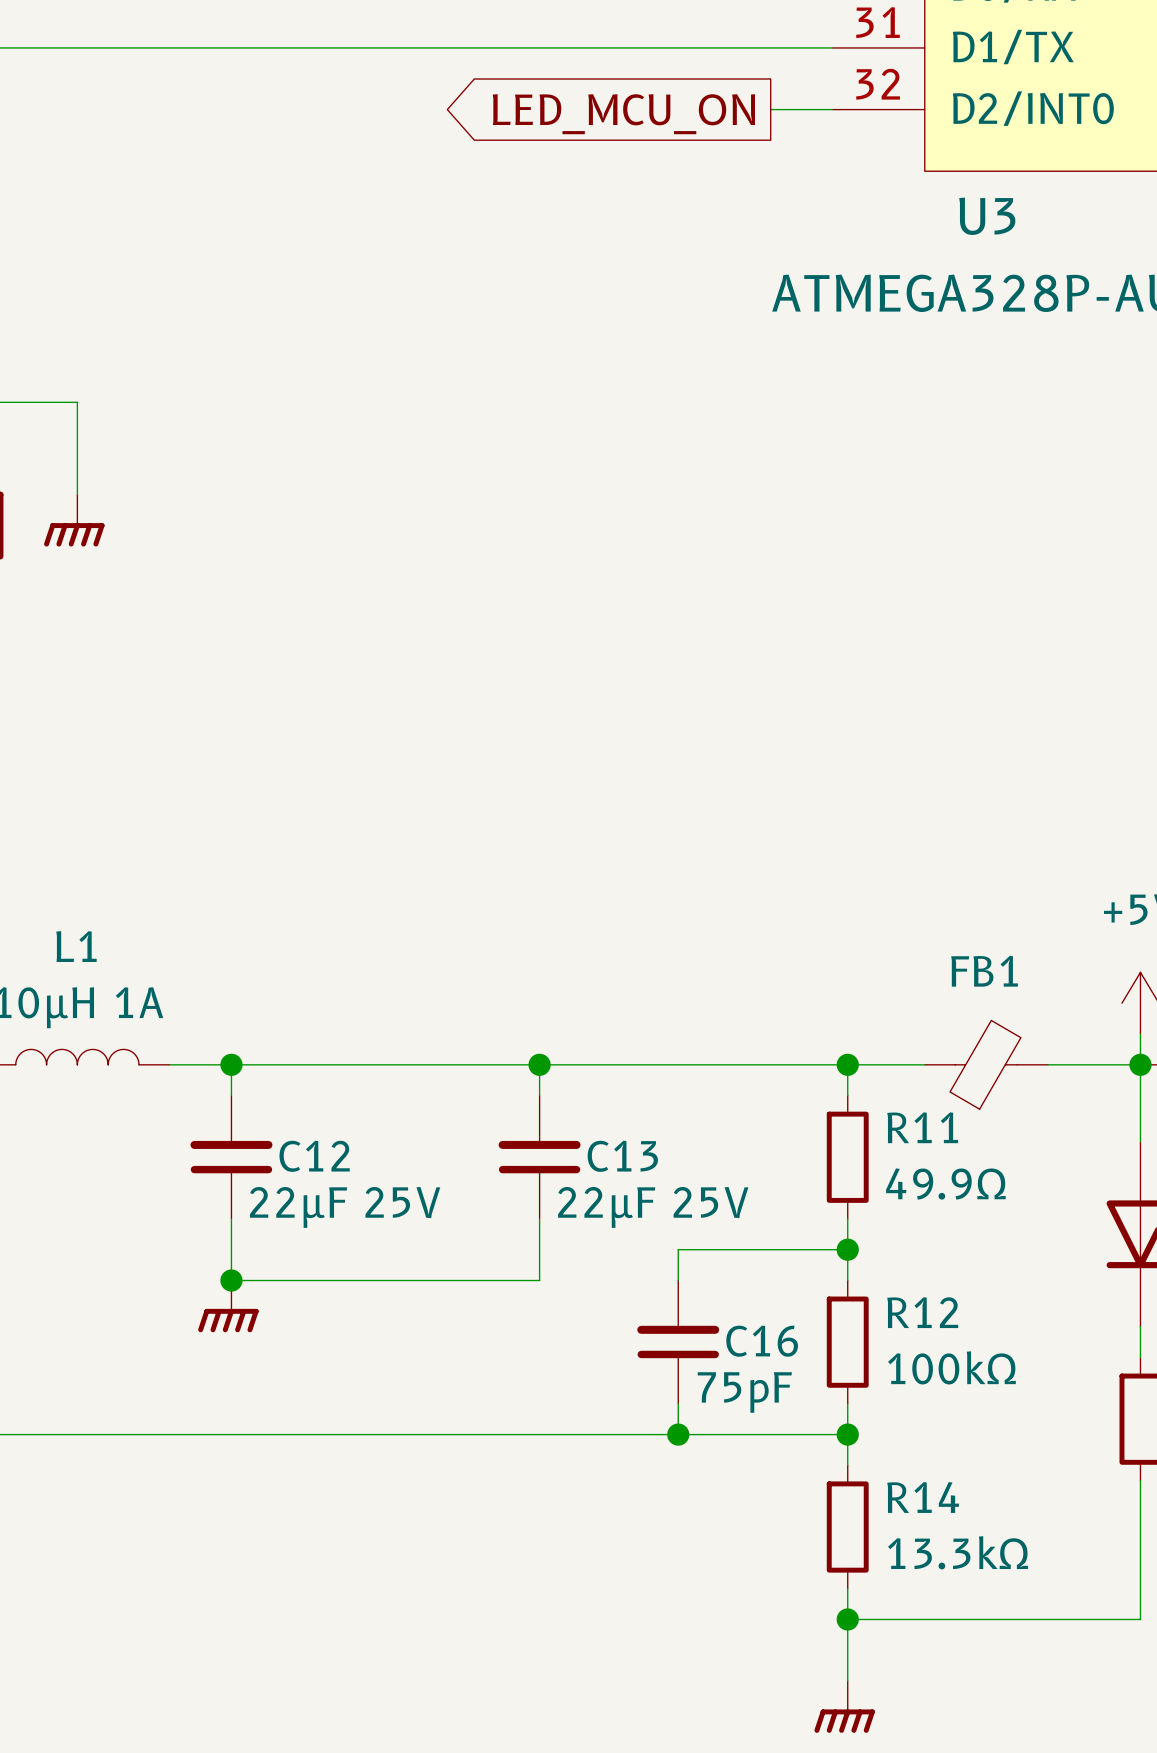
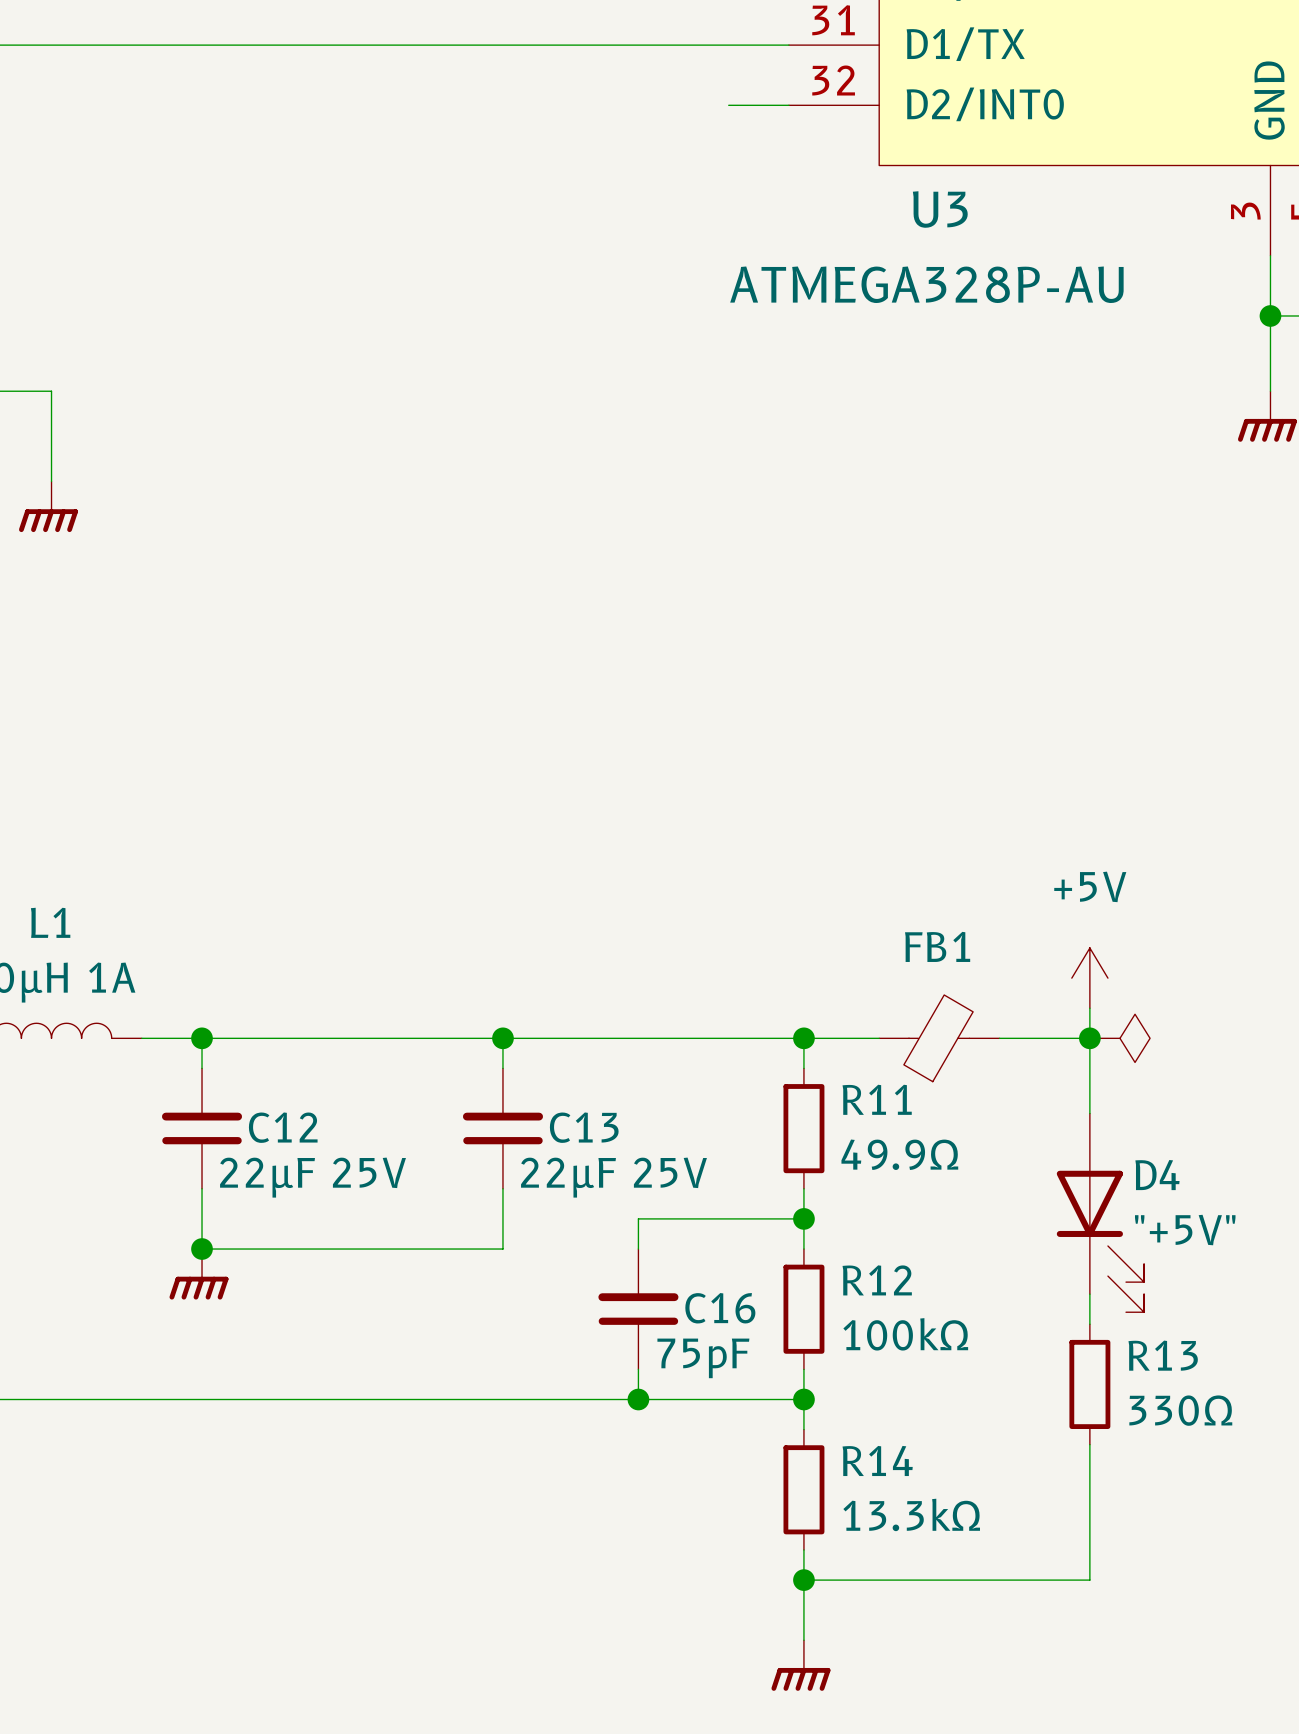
global label: LED_MCU_ON (623, 114) -> none

